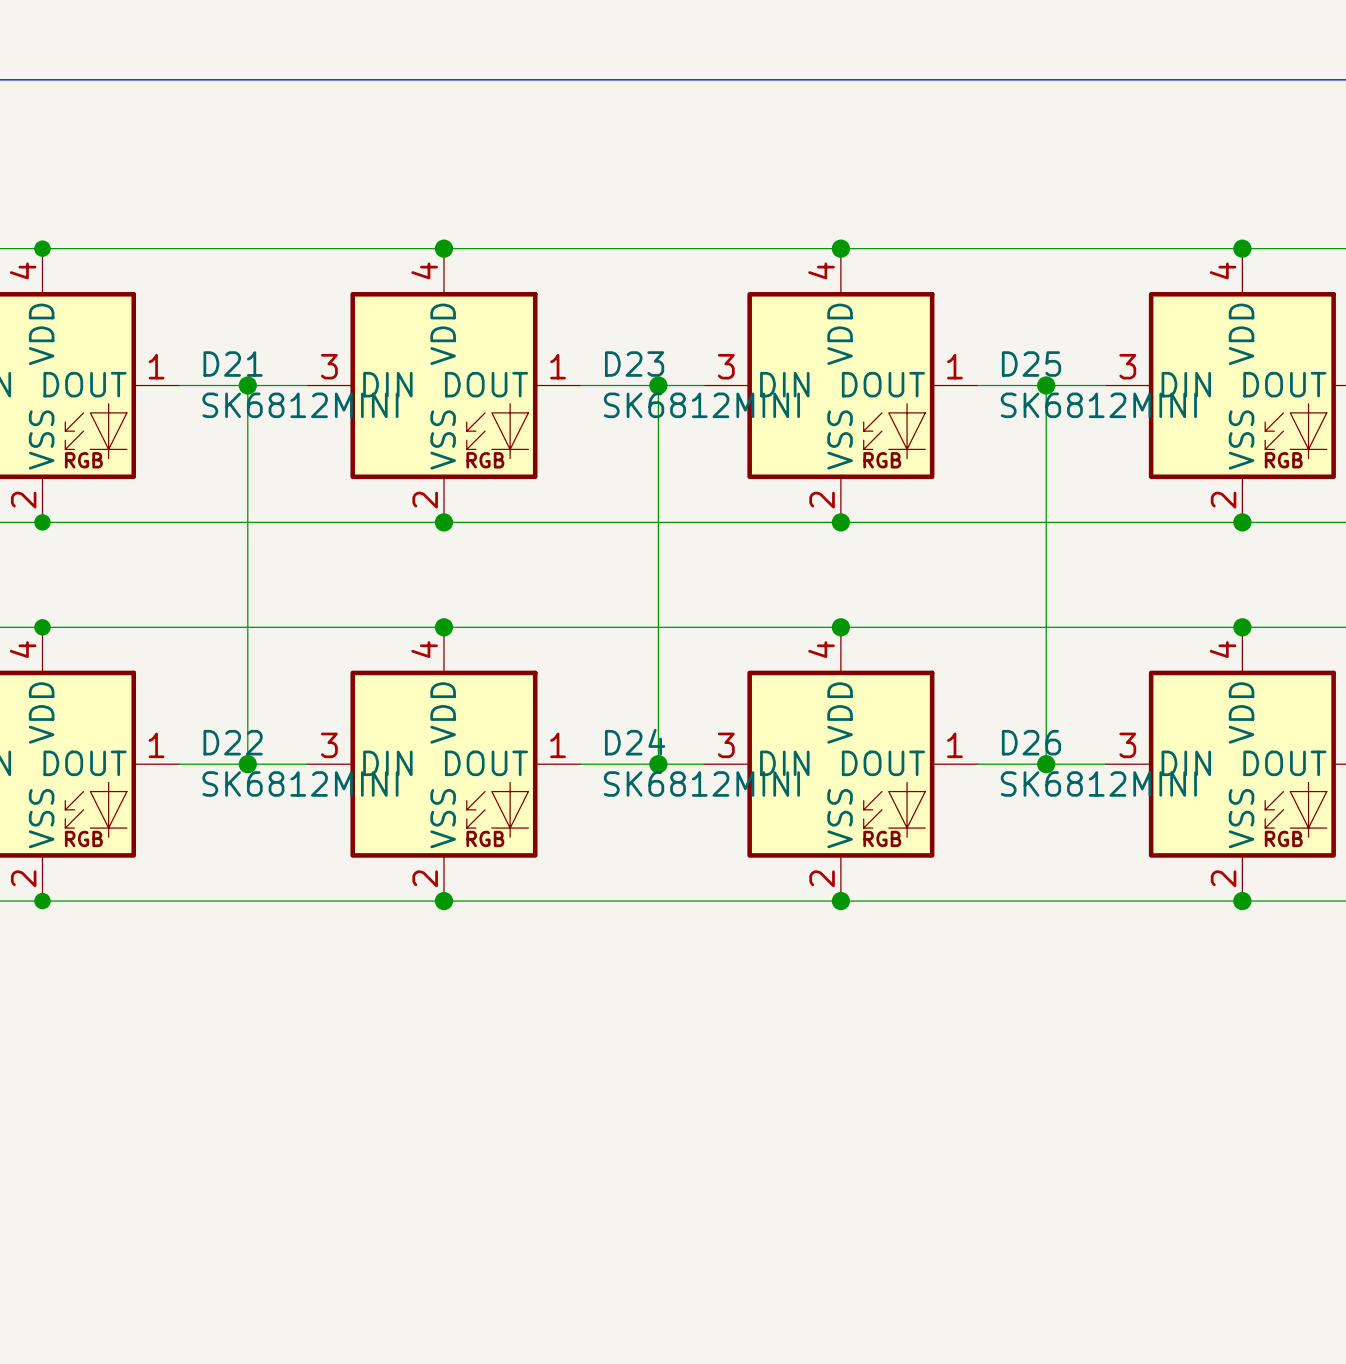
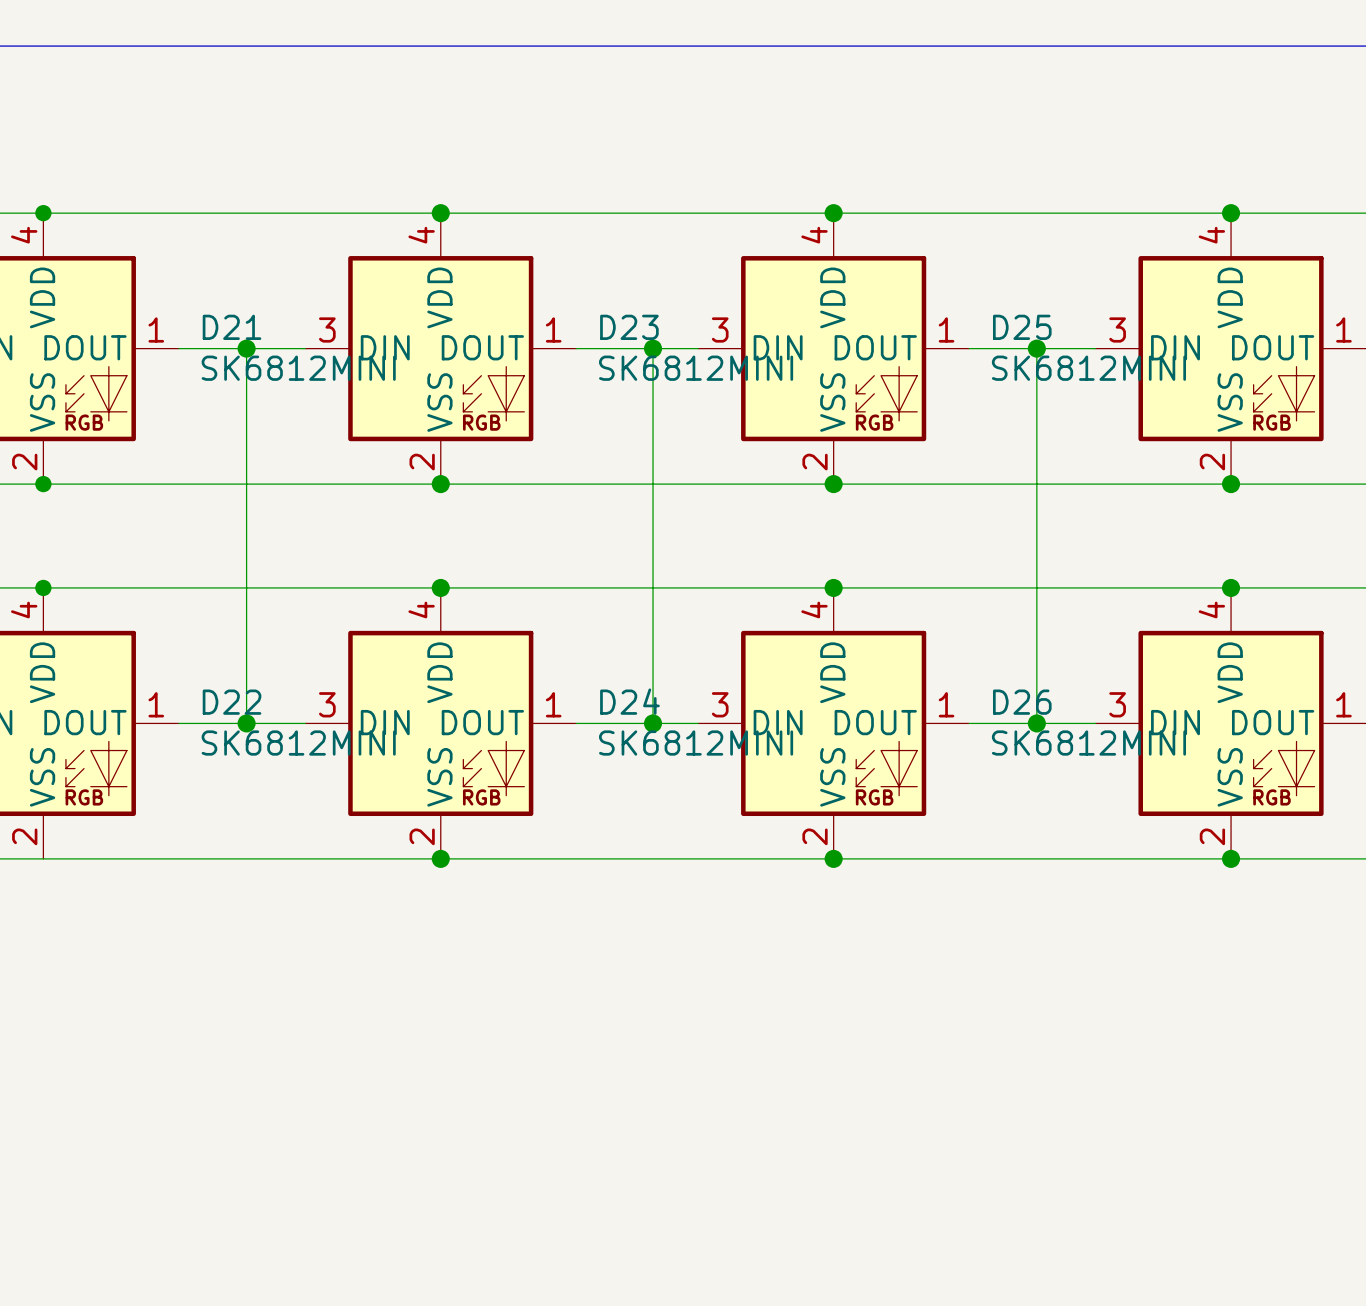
junction: (42, 901) -> none

